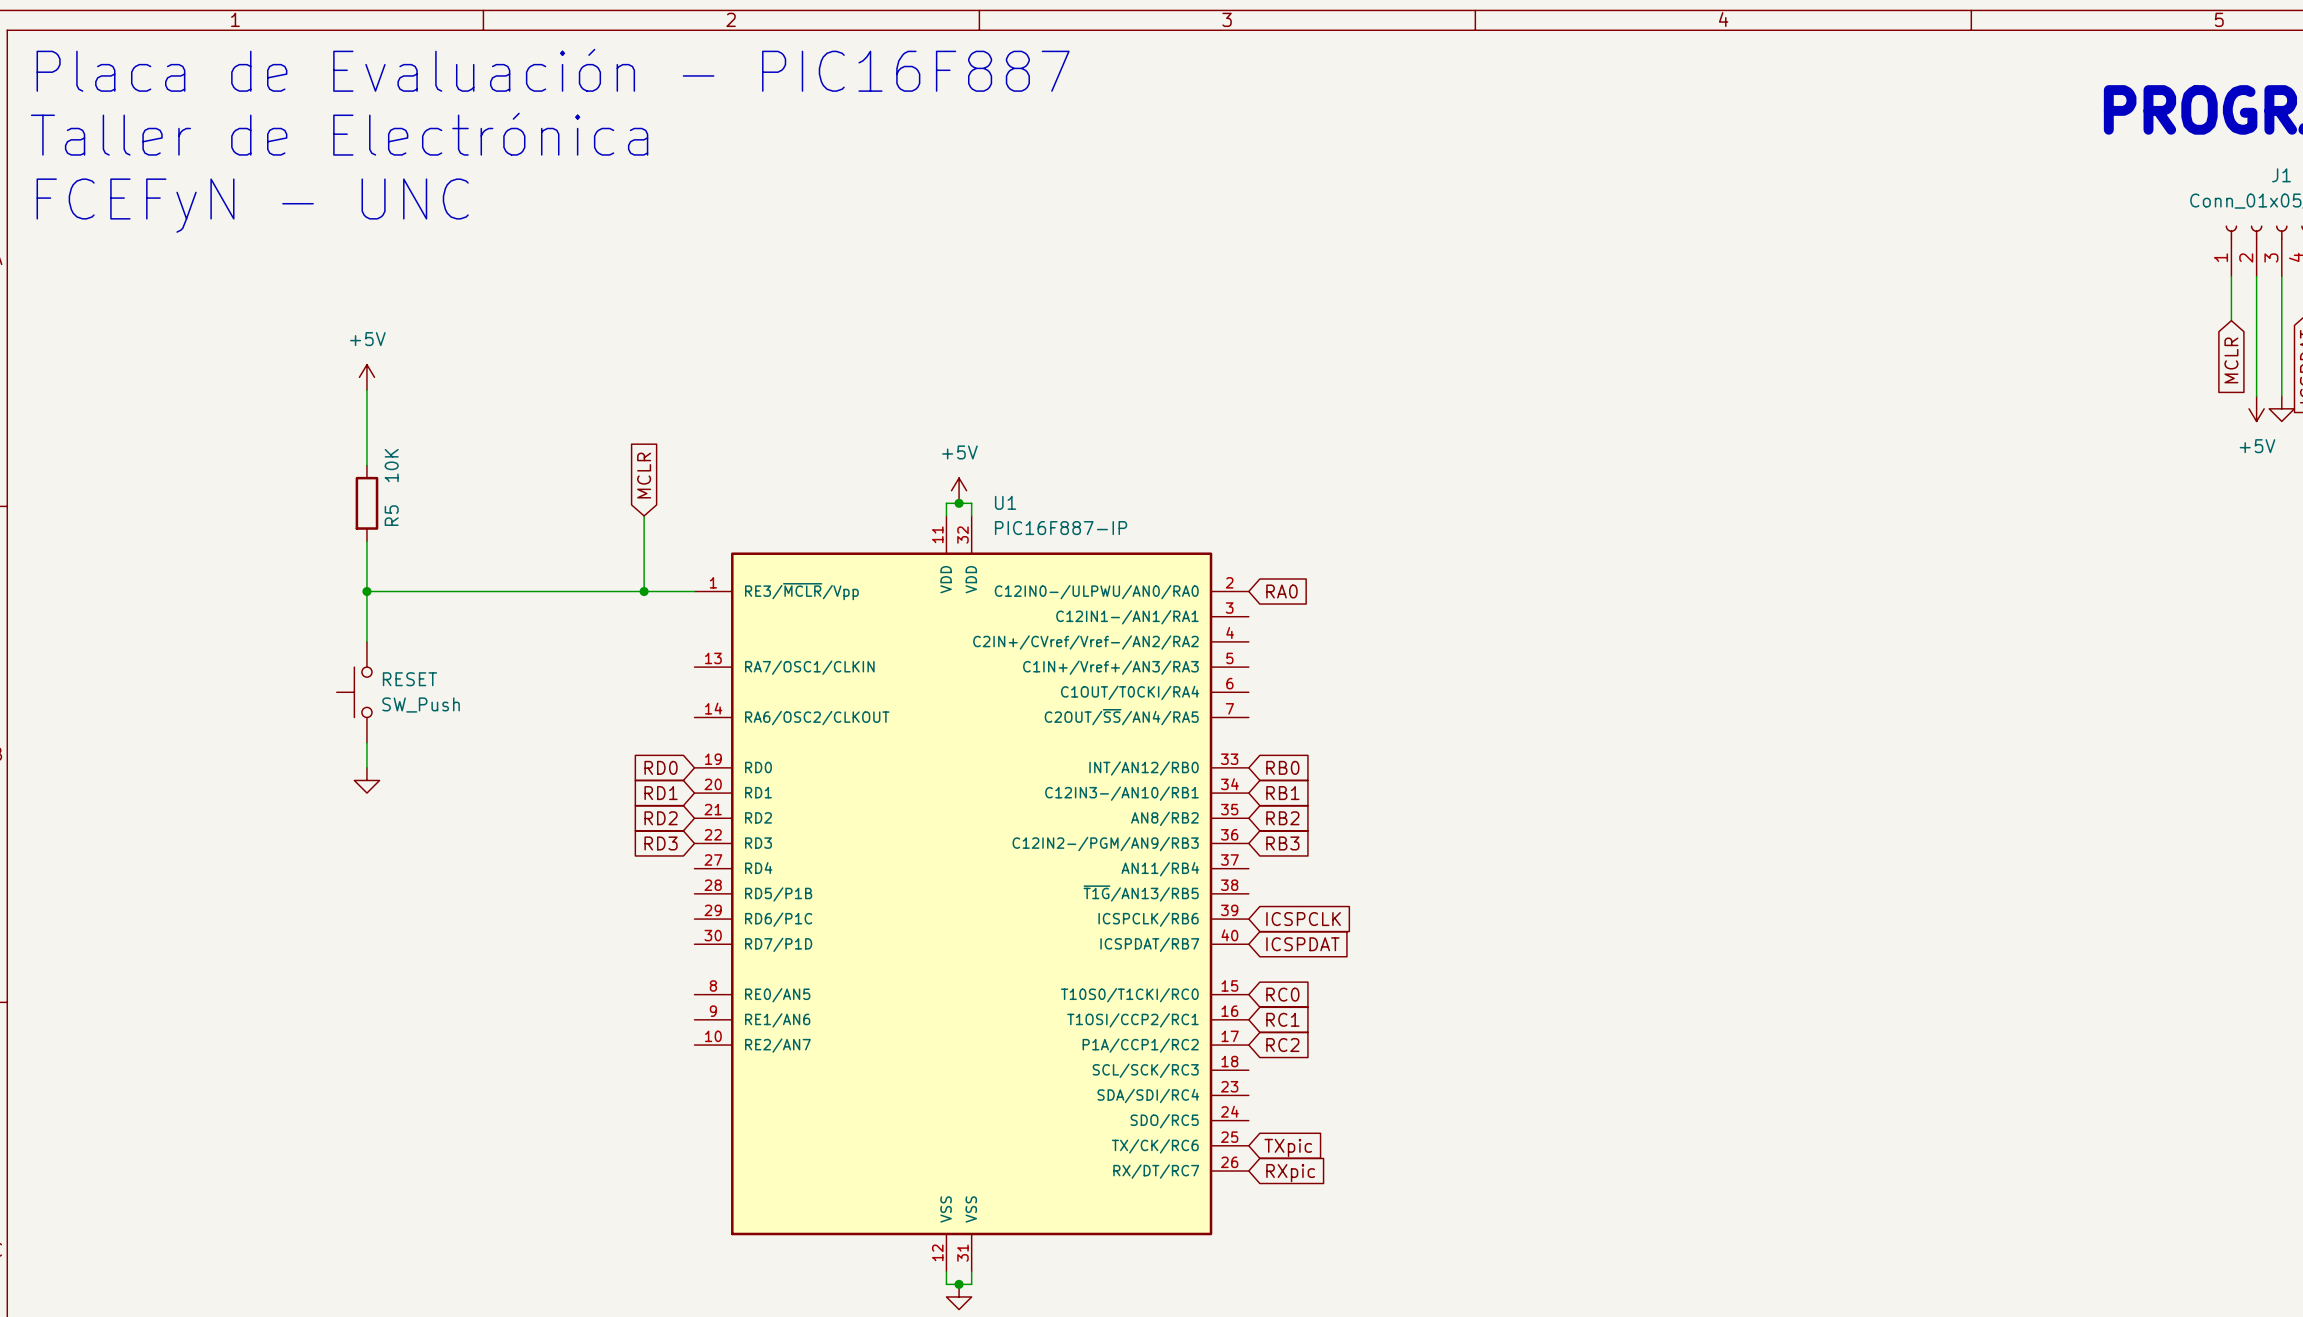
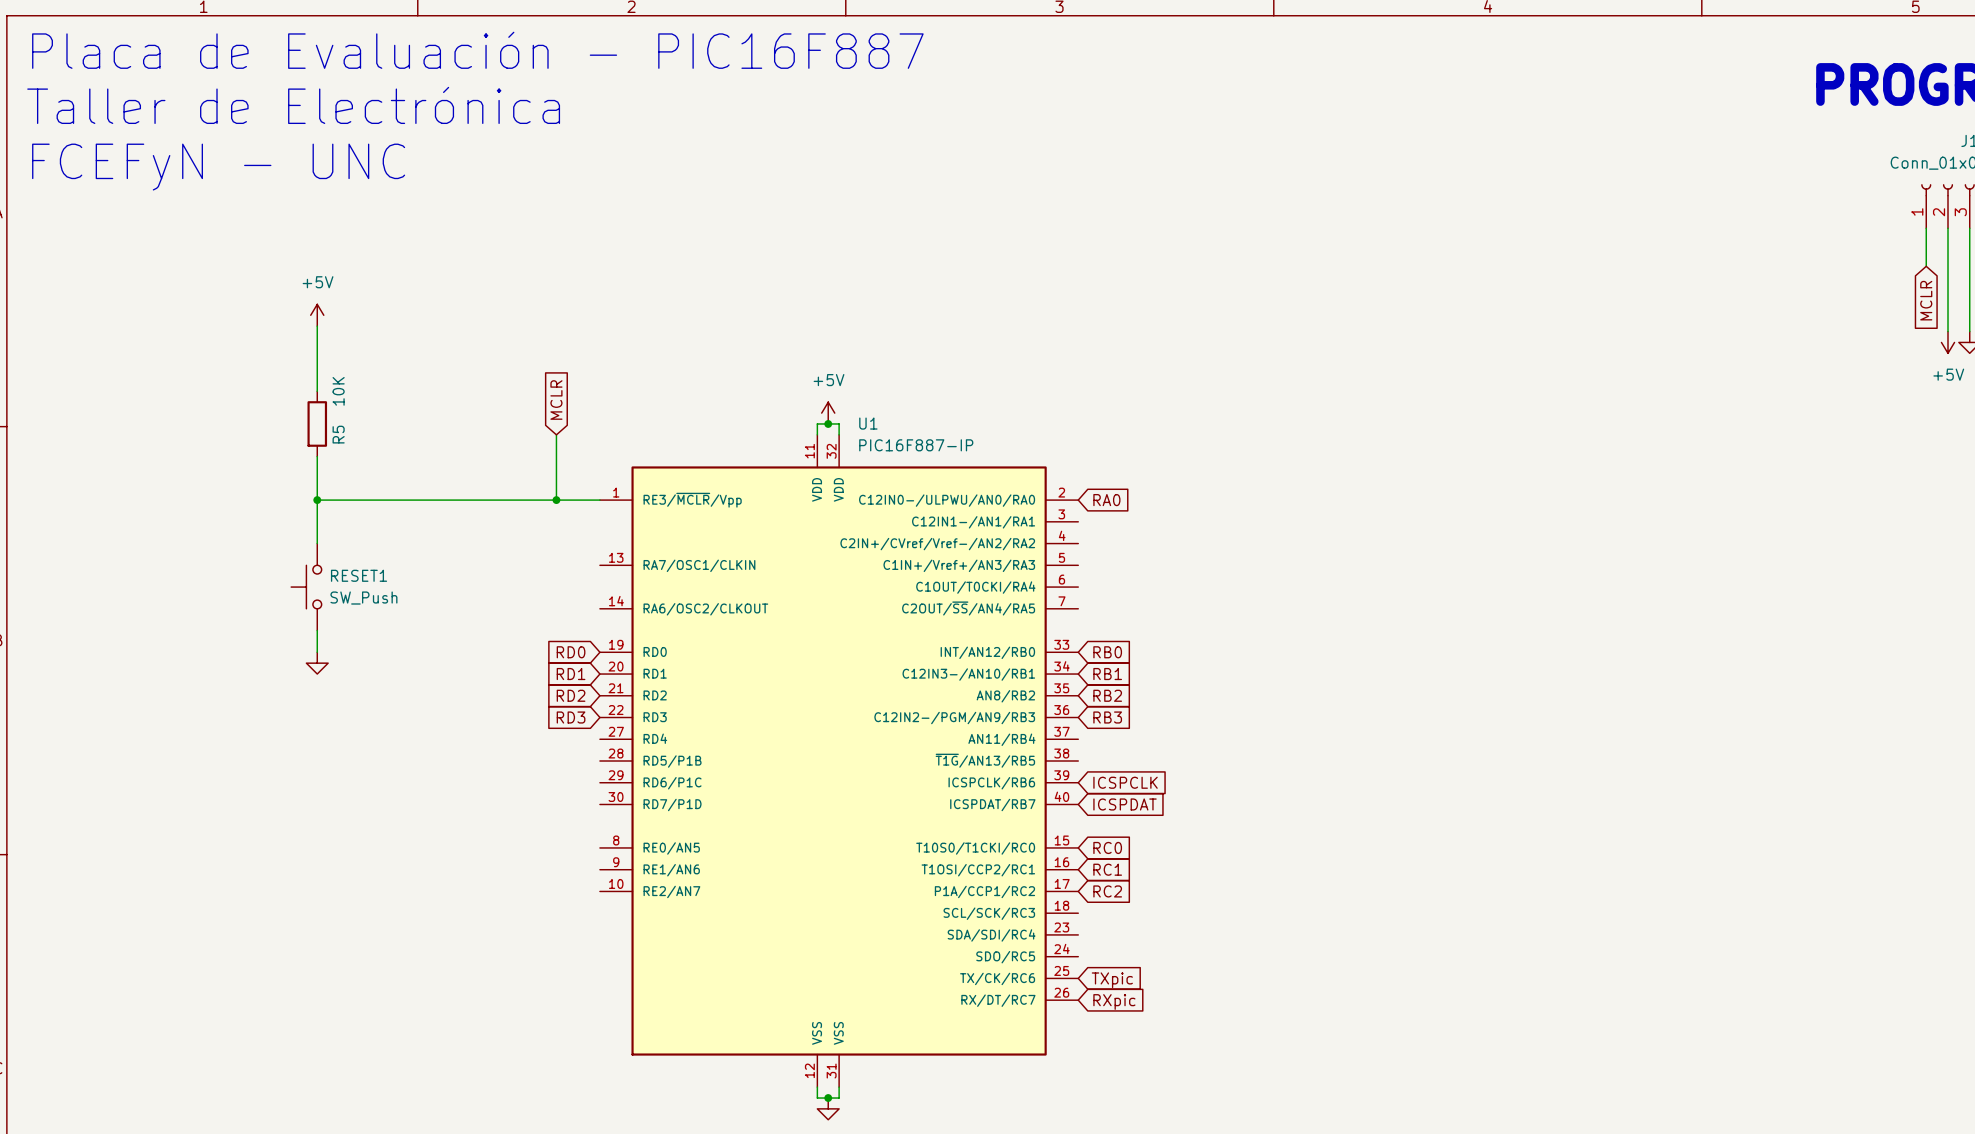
RESET name: RESET (409, 679) -> RESET1 (359, 575)

